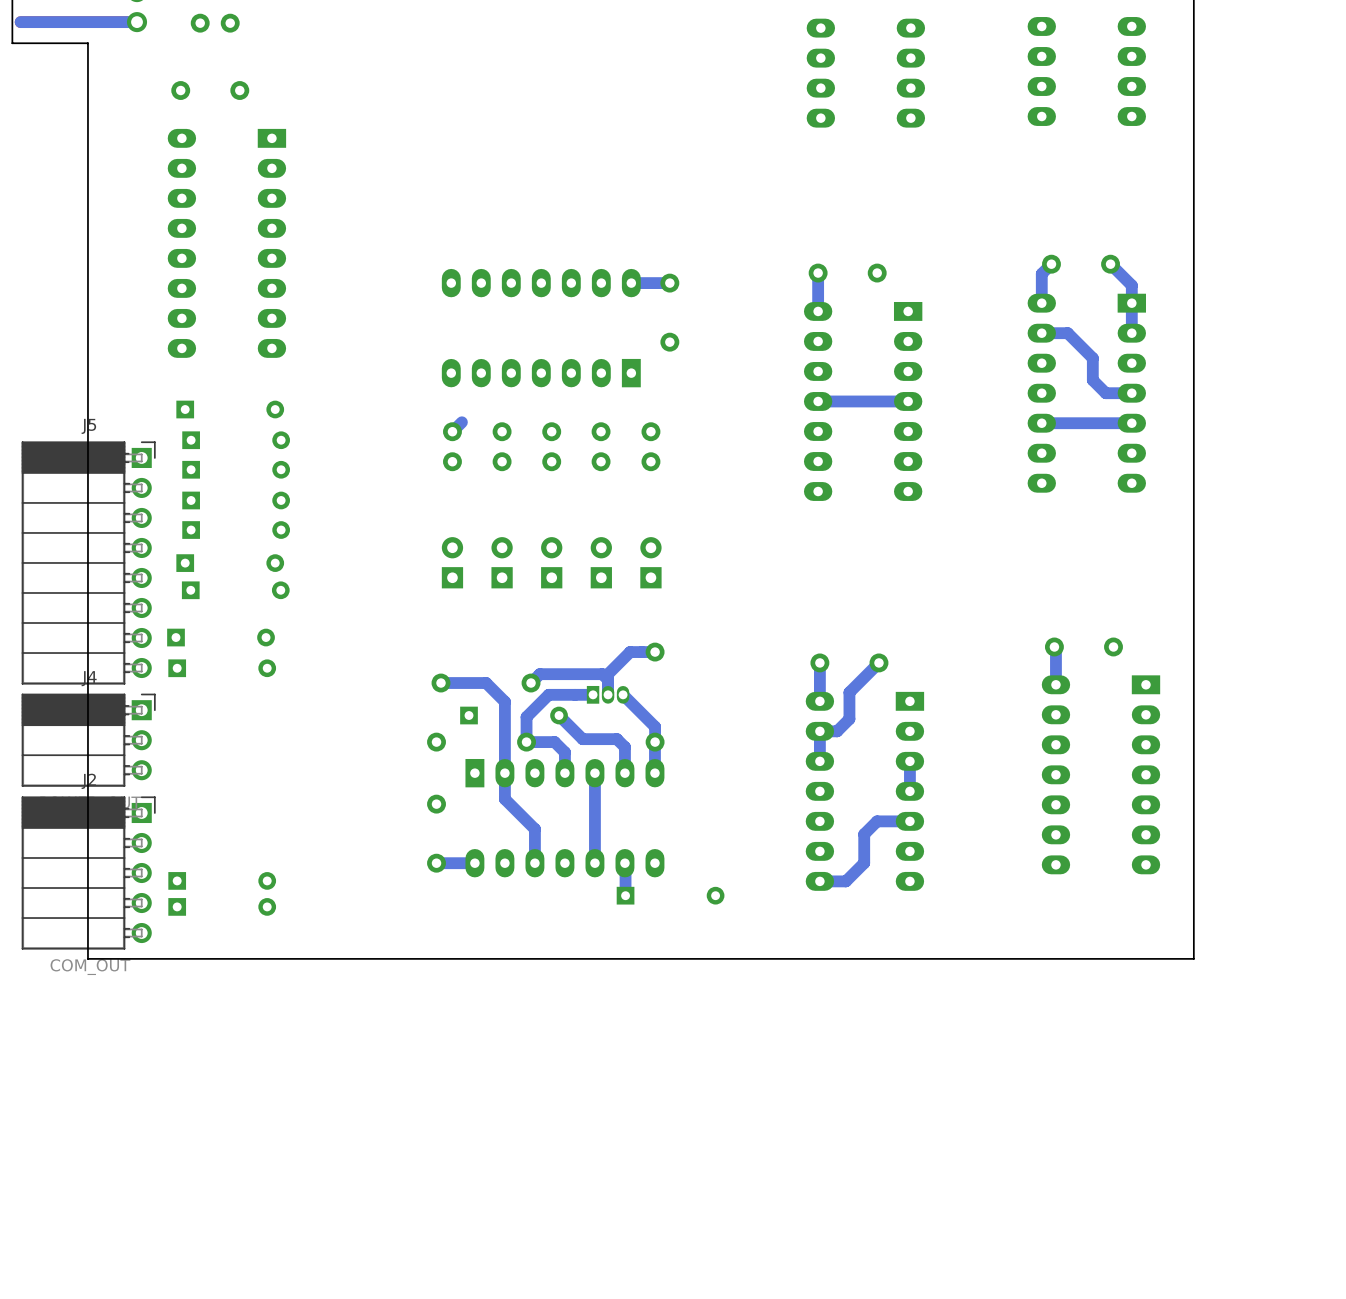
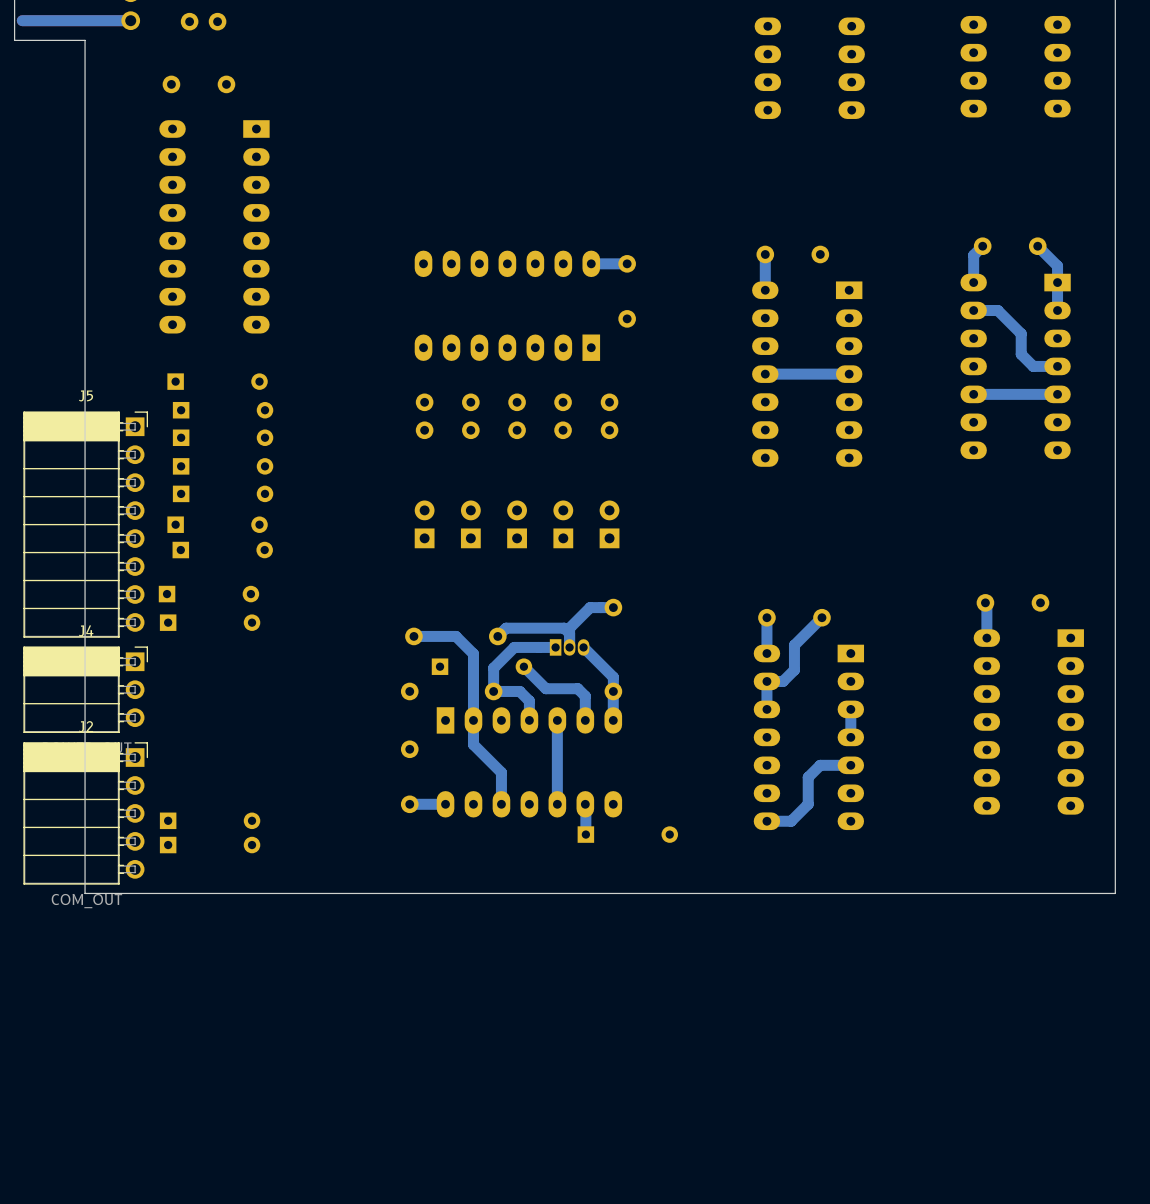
bottom track: (461, 422) (452, 431) -> none

